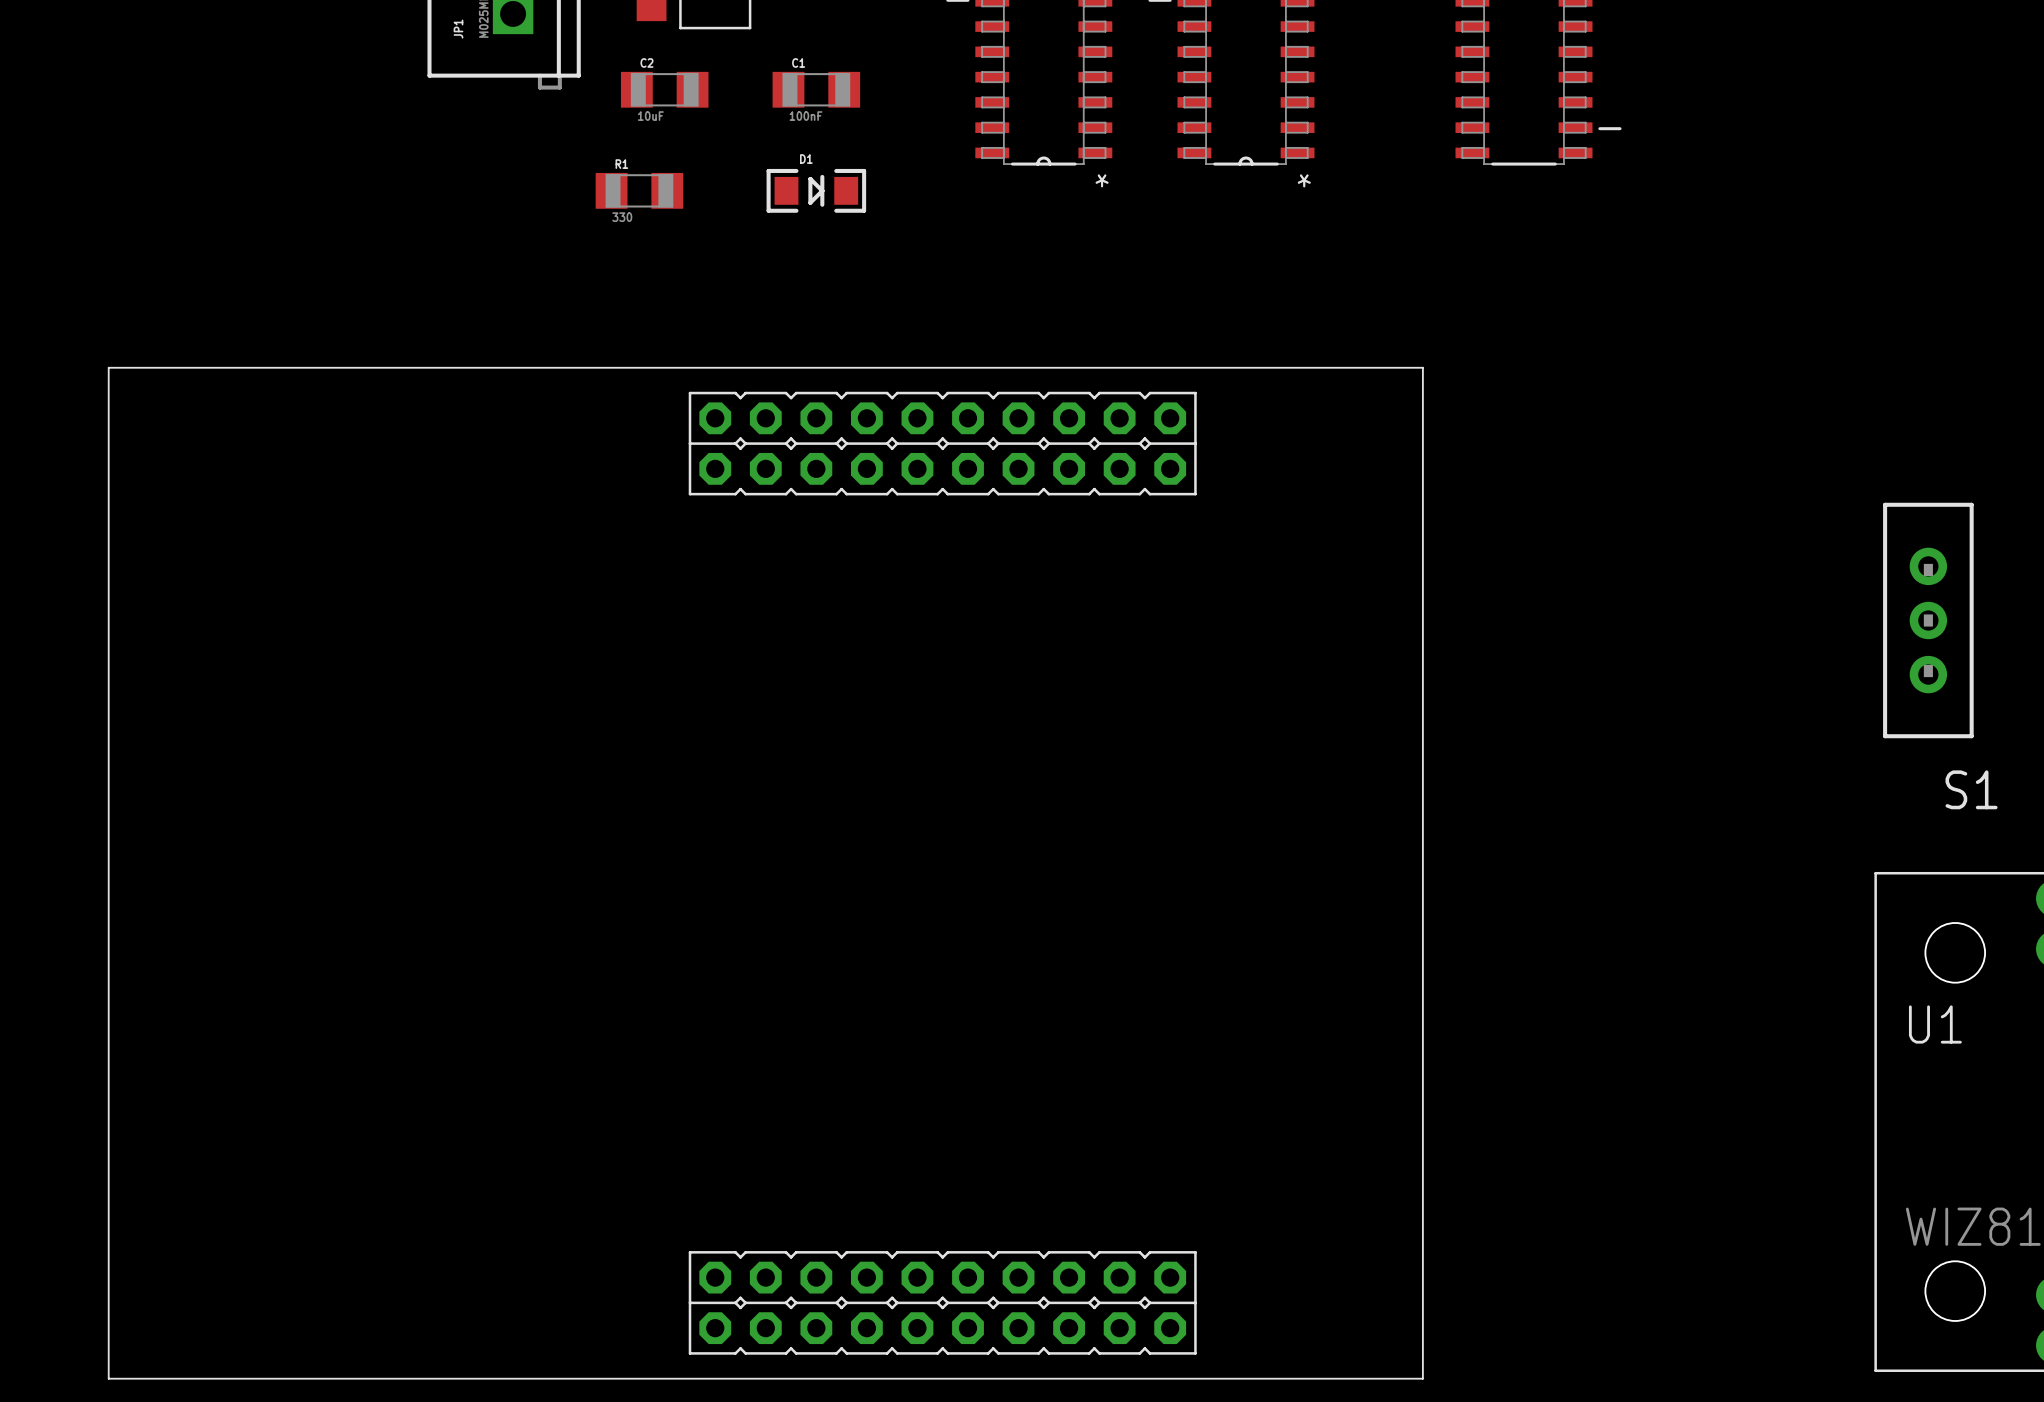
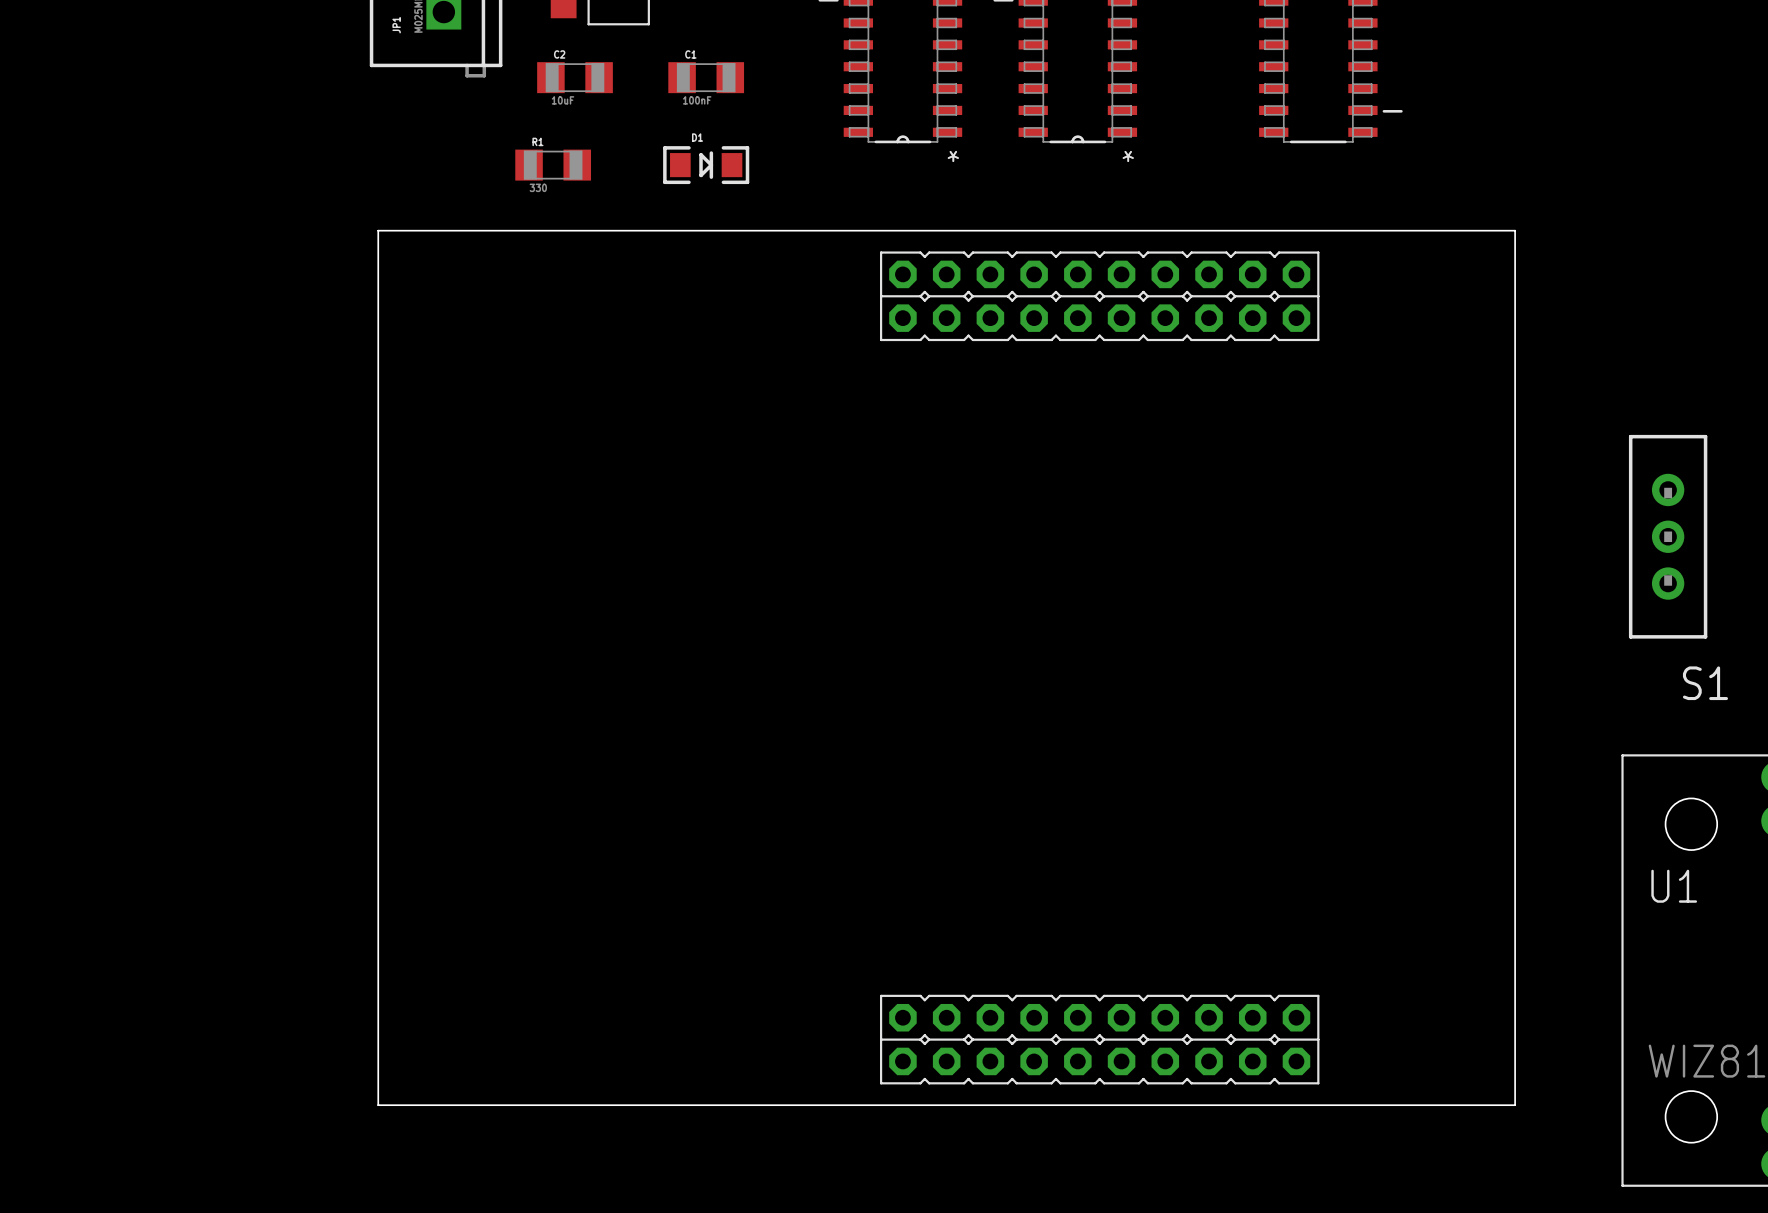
part: none -> (946, 667)
part: (765, 873) -> none

